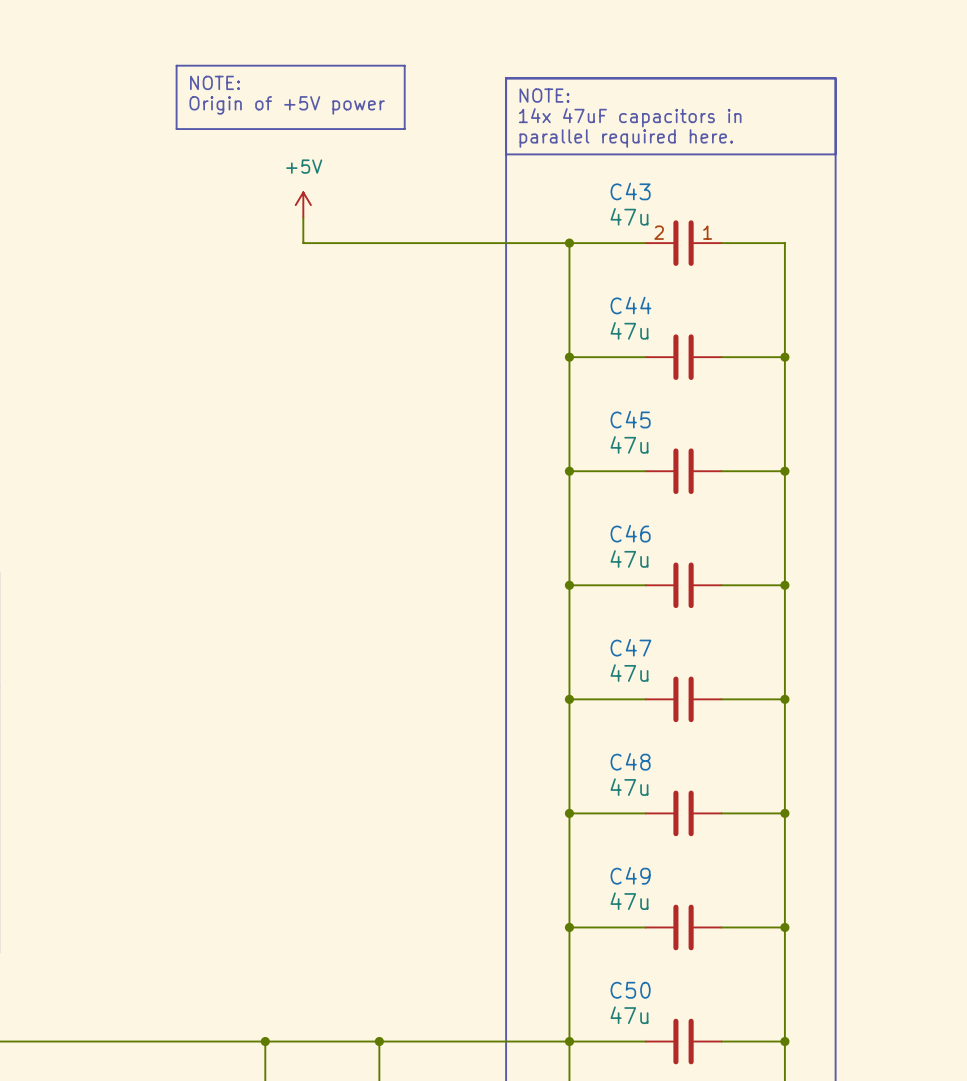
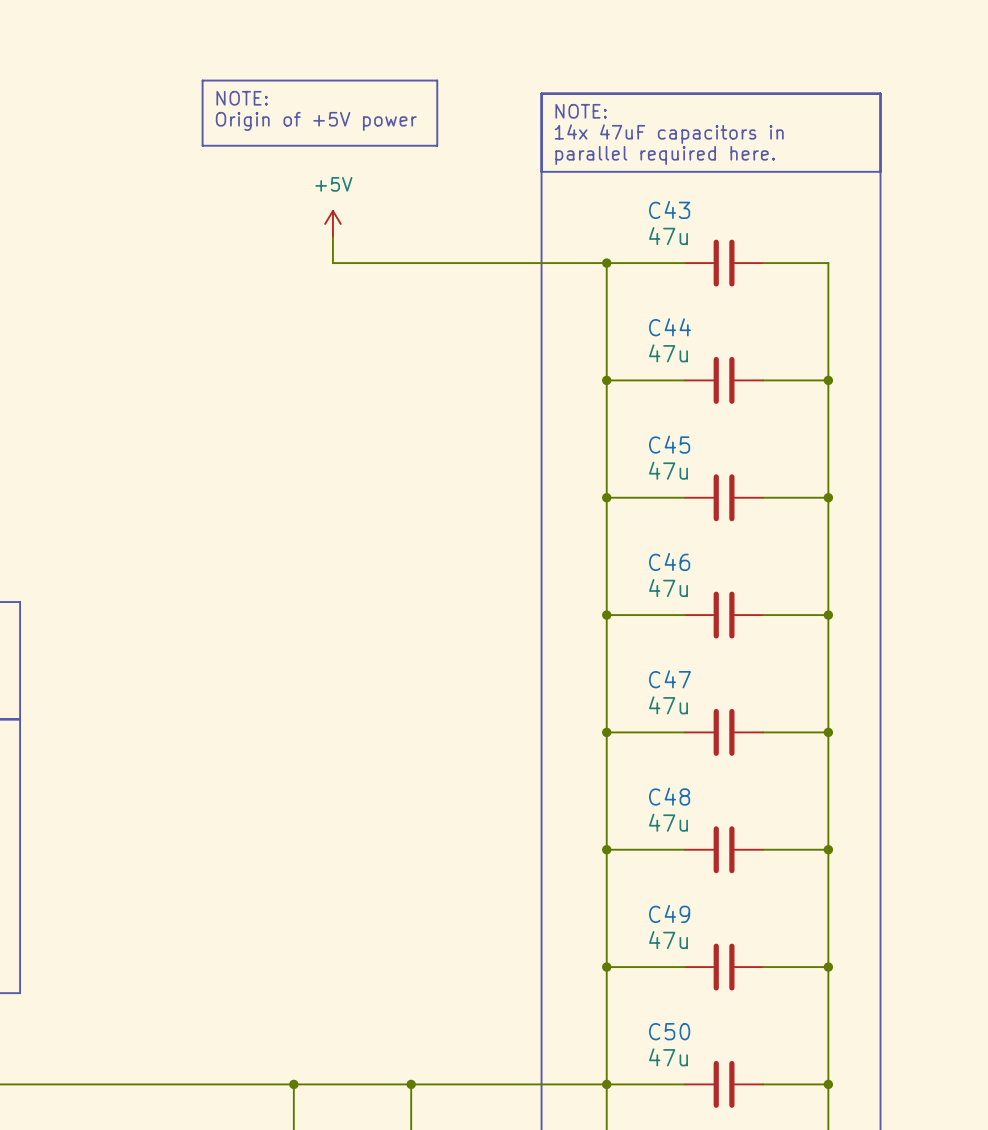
C43 pin number: 2 (659, 232) -> none
C43 pin number: 1 (707, 232) -> none

